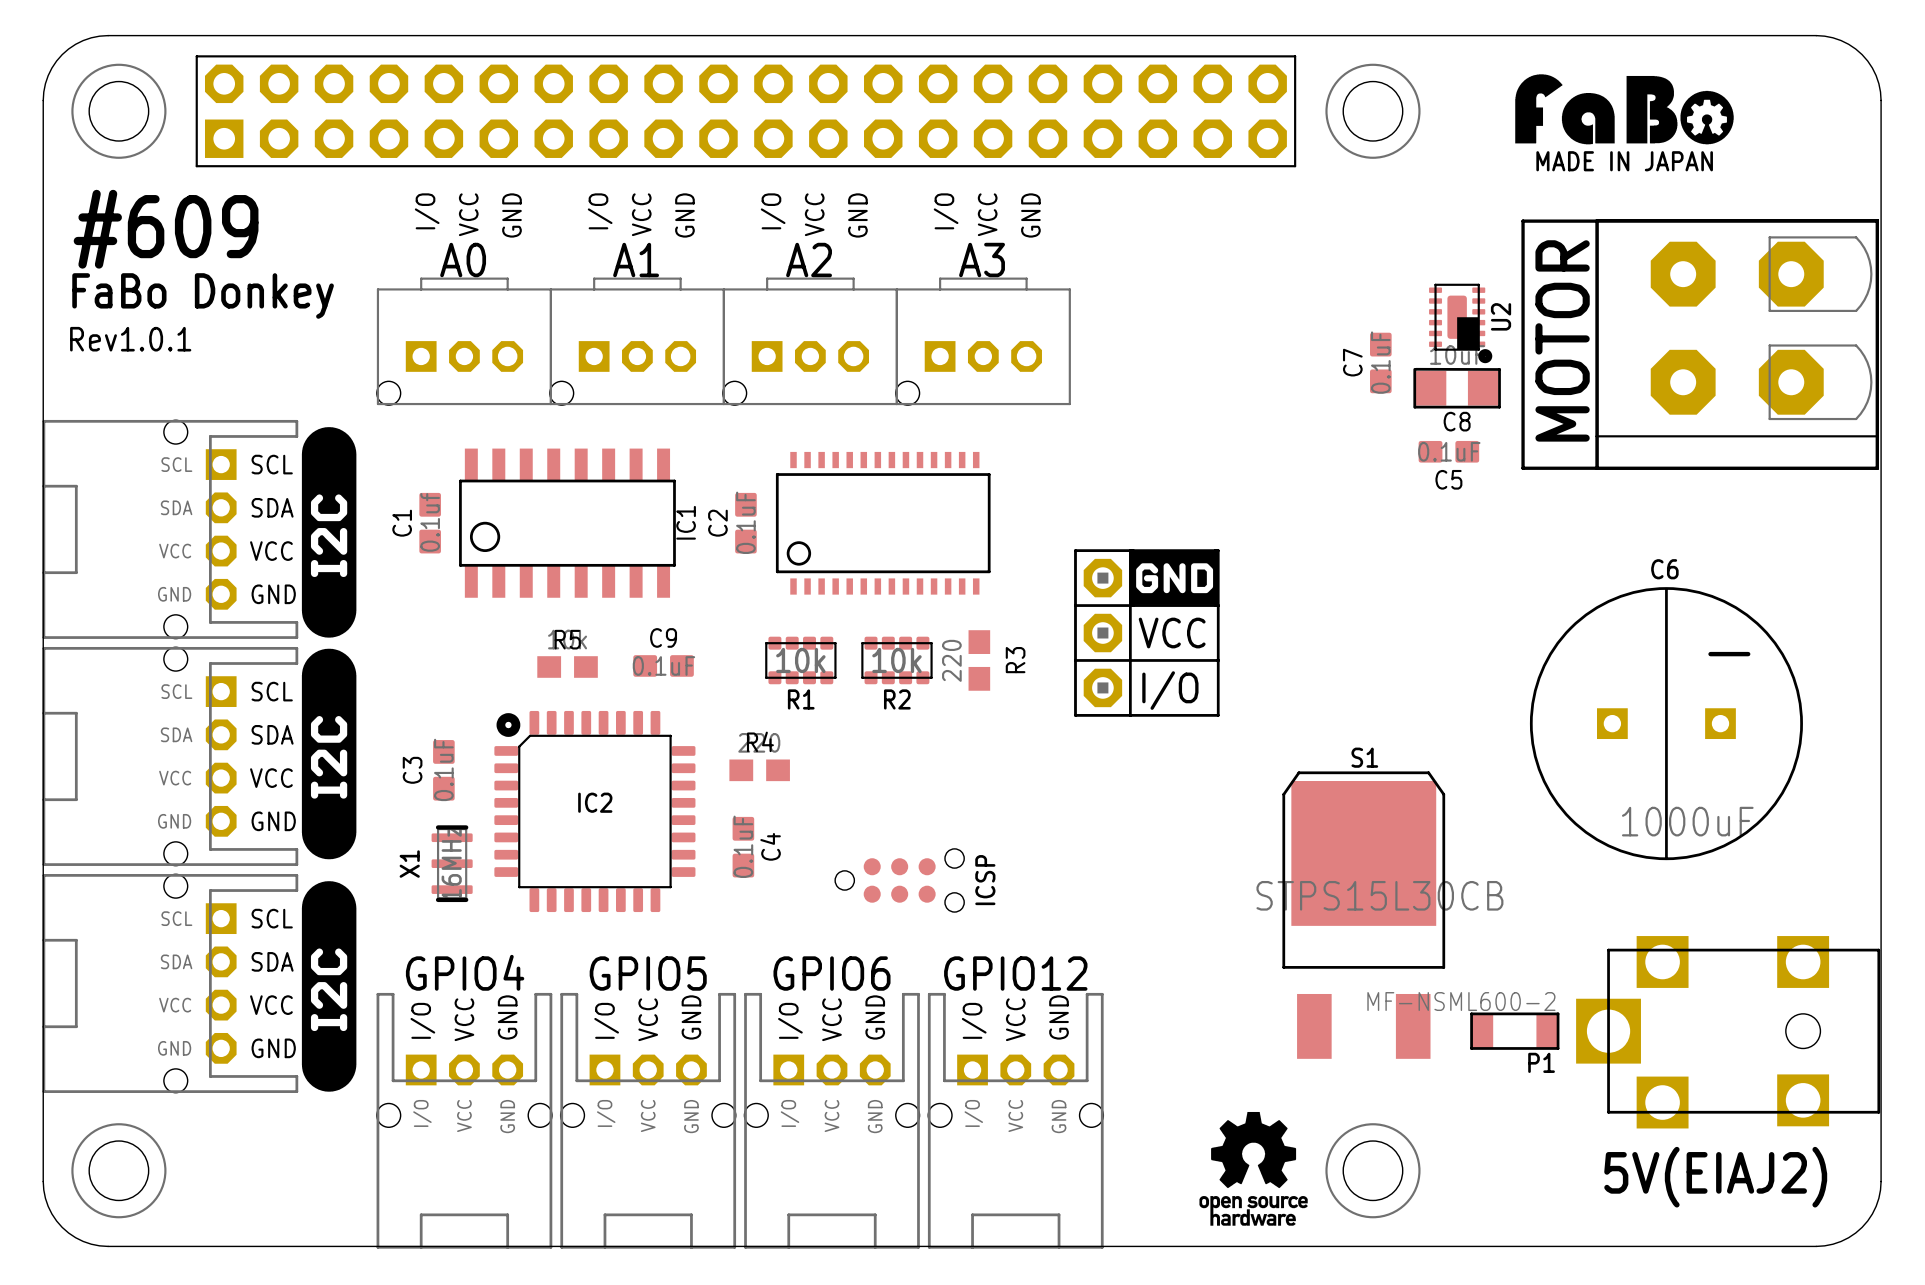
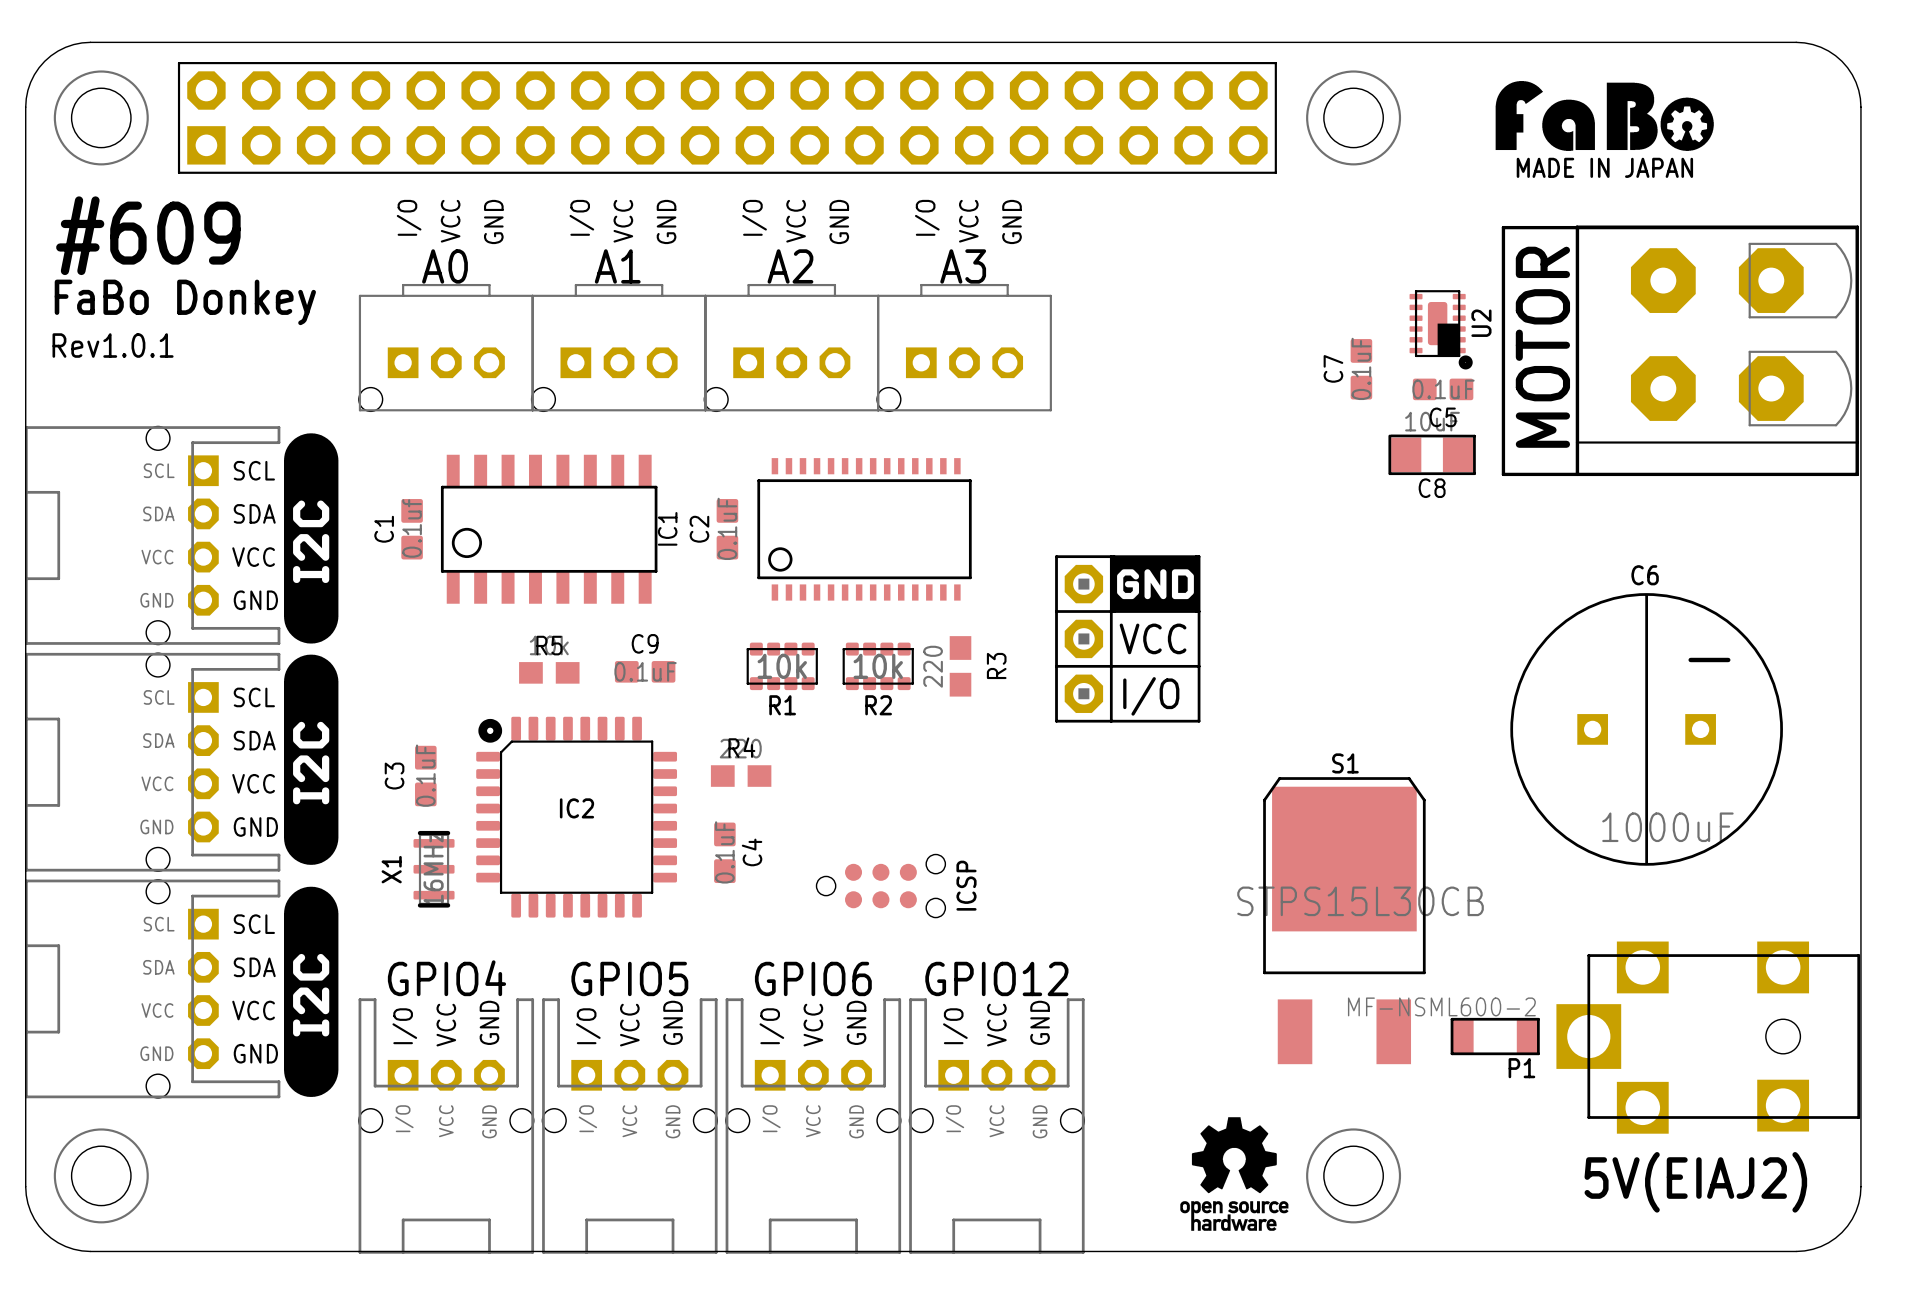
C8 position: (1457, 388) -> (1432, 454)
C5 position: (1448, 451) -> (1443, 389)

